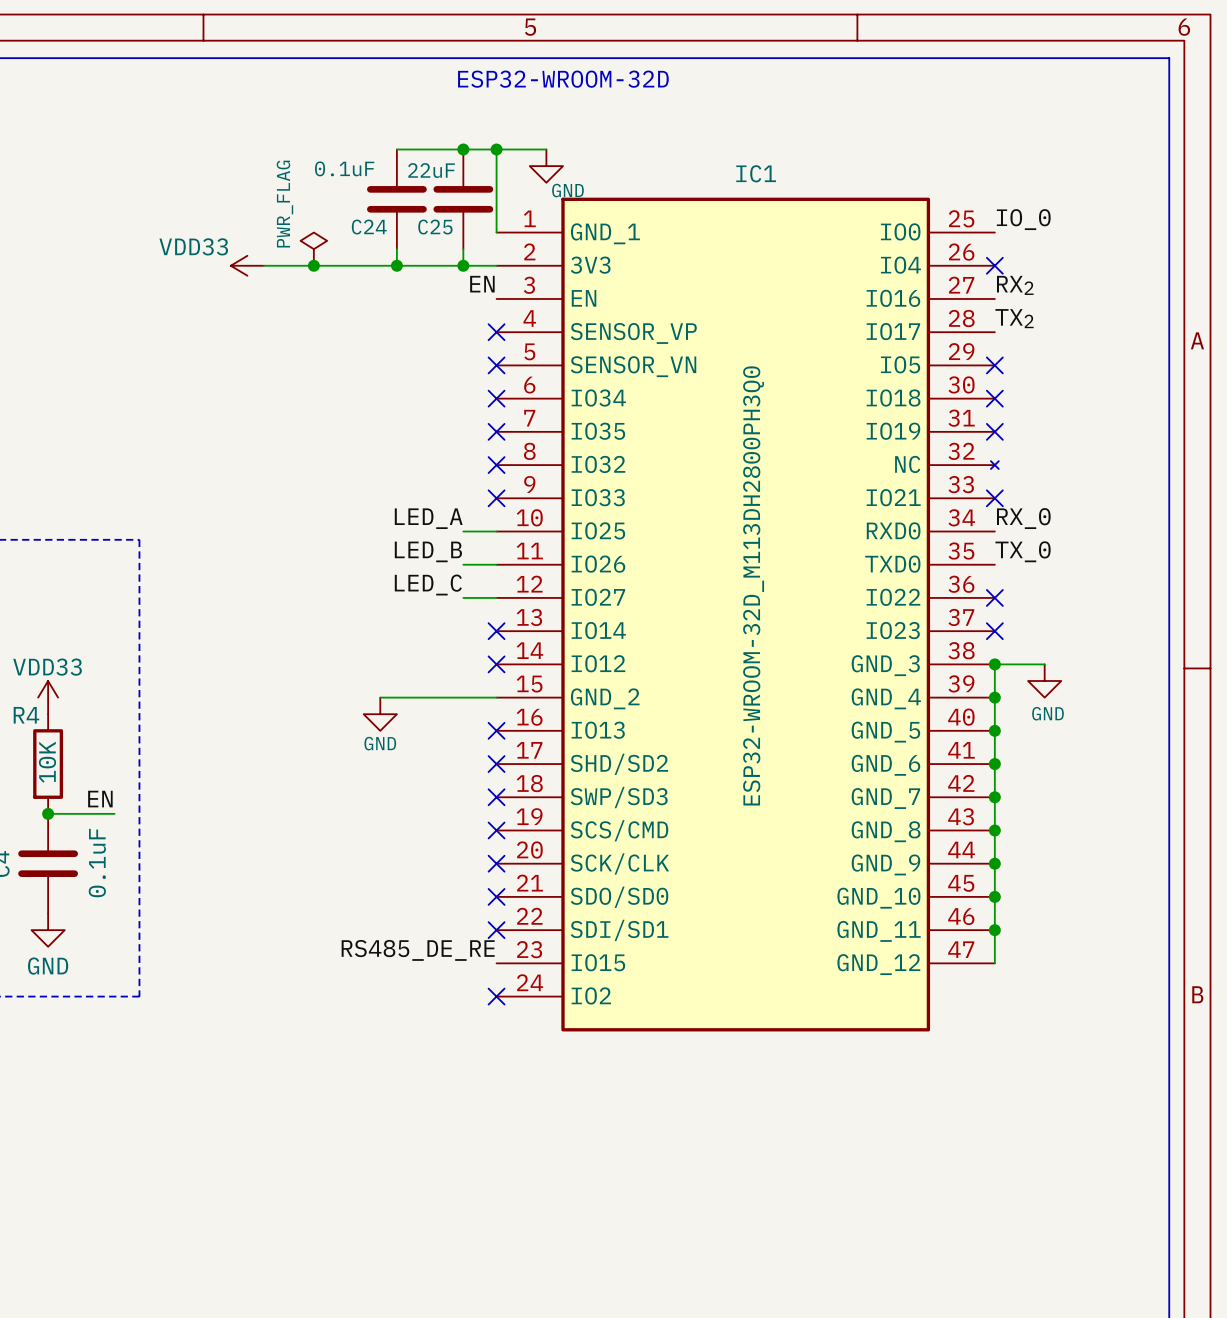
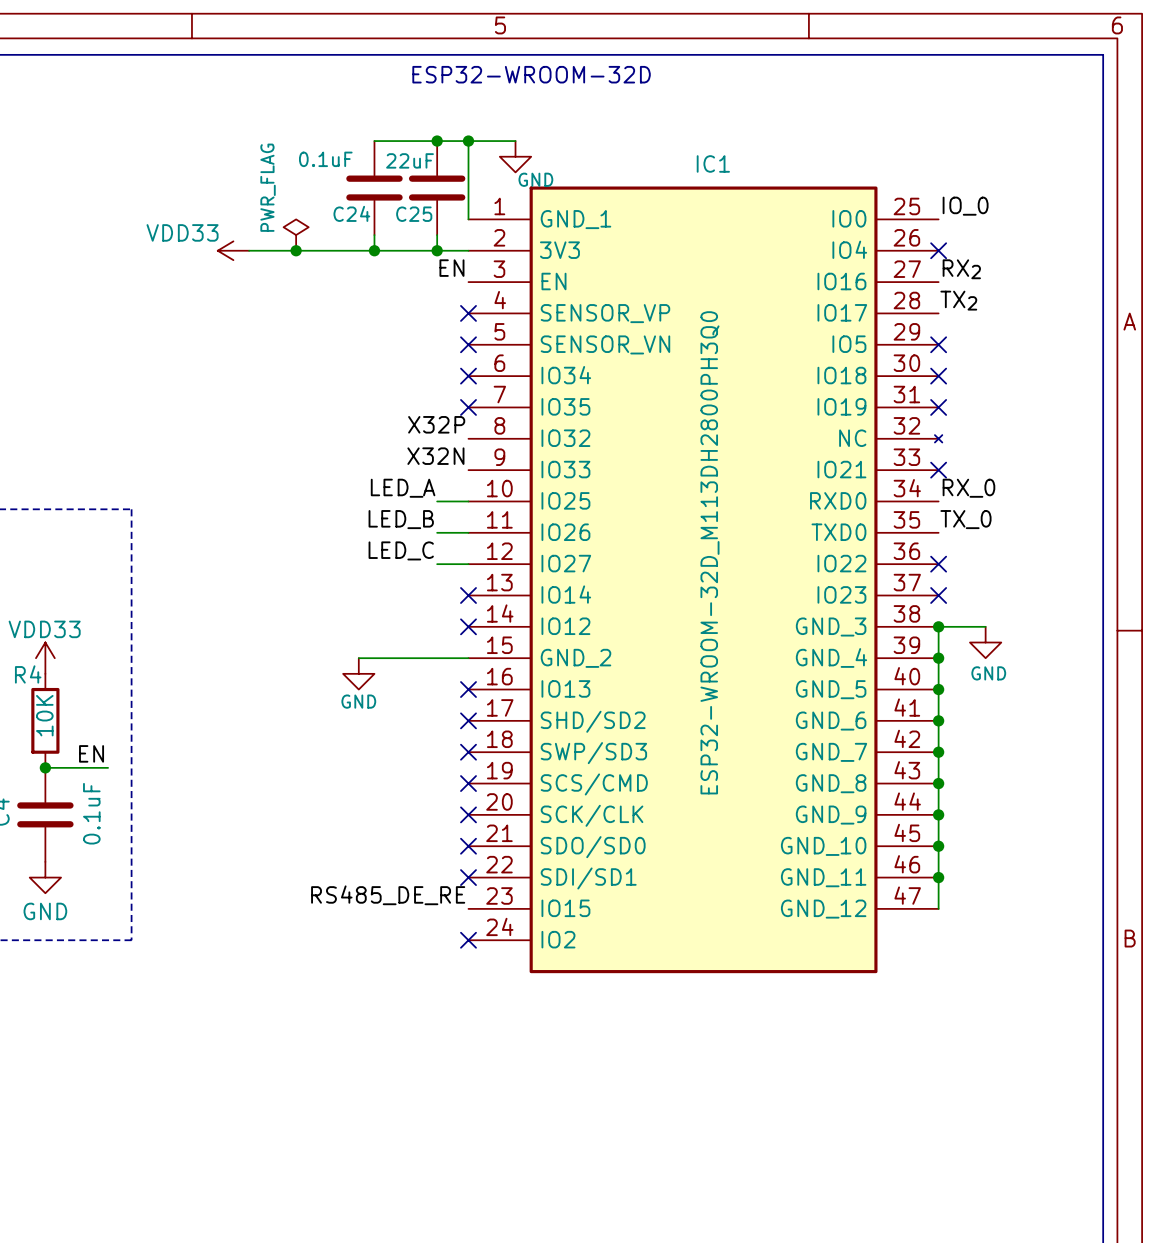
label: none -> X32P (436, 424)
no-connect mark: (496, 465) -> none
label: none -> X32N (435, 456)
no-connect mark: (496, 498) -> none

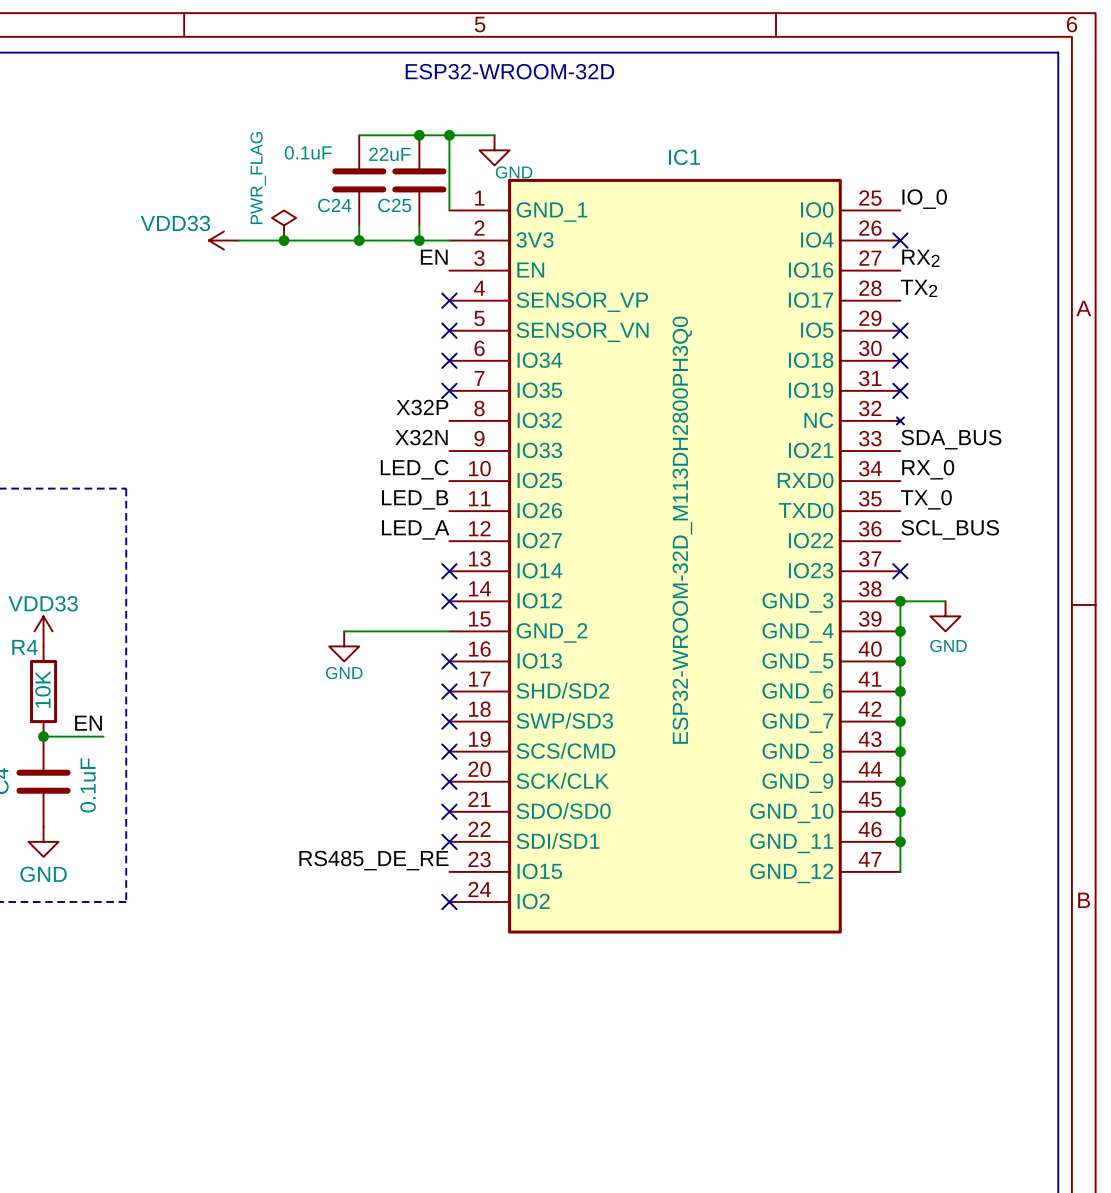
label: none -> SDA_BUS (951, 439)
no-connect mark: (938, 470) -> none
label position: LED_A (403, 488) -> LED_A (415, 529)
wire: (437, 501) (468, 501) -> none
label position: LED_B (401, 519) -> LED_B (415, 499)
wire: (437, 532) (468, 532) -> none
label position: LED_C (401, 550) -> LED_C (414, 469)
label: none -> SCL_BUS (950, 529)
wire: (437, 564) (468, 564) -> none
no-connect mark: (938, 564) -> none

